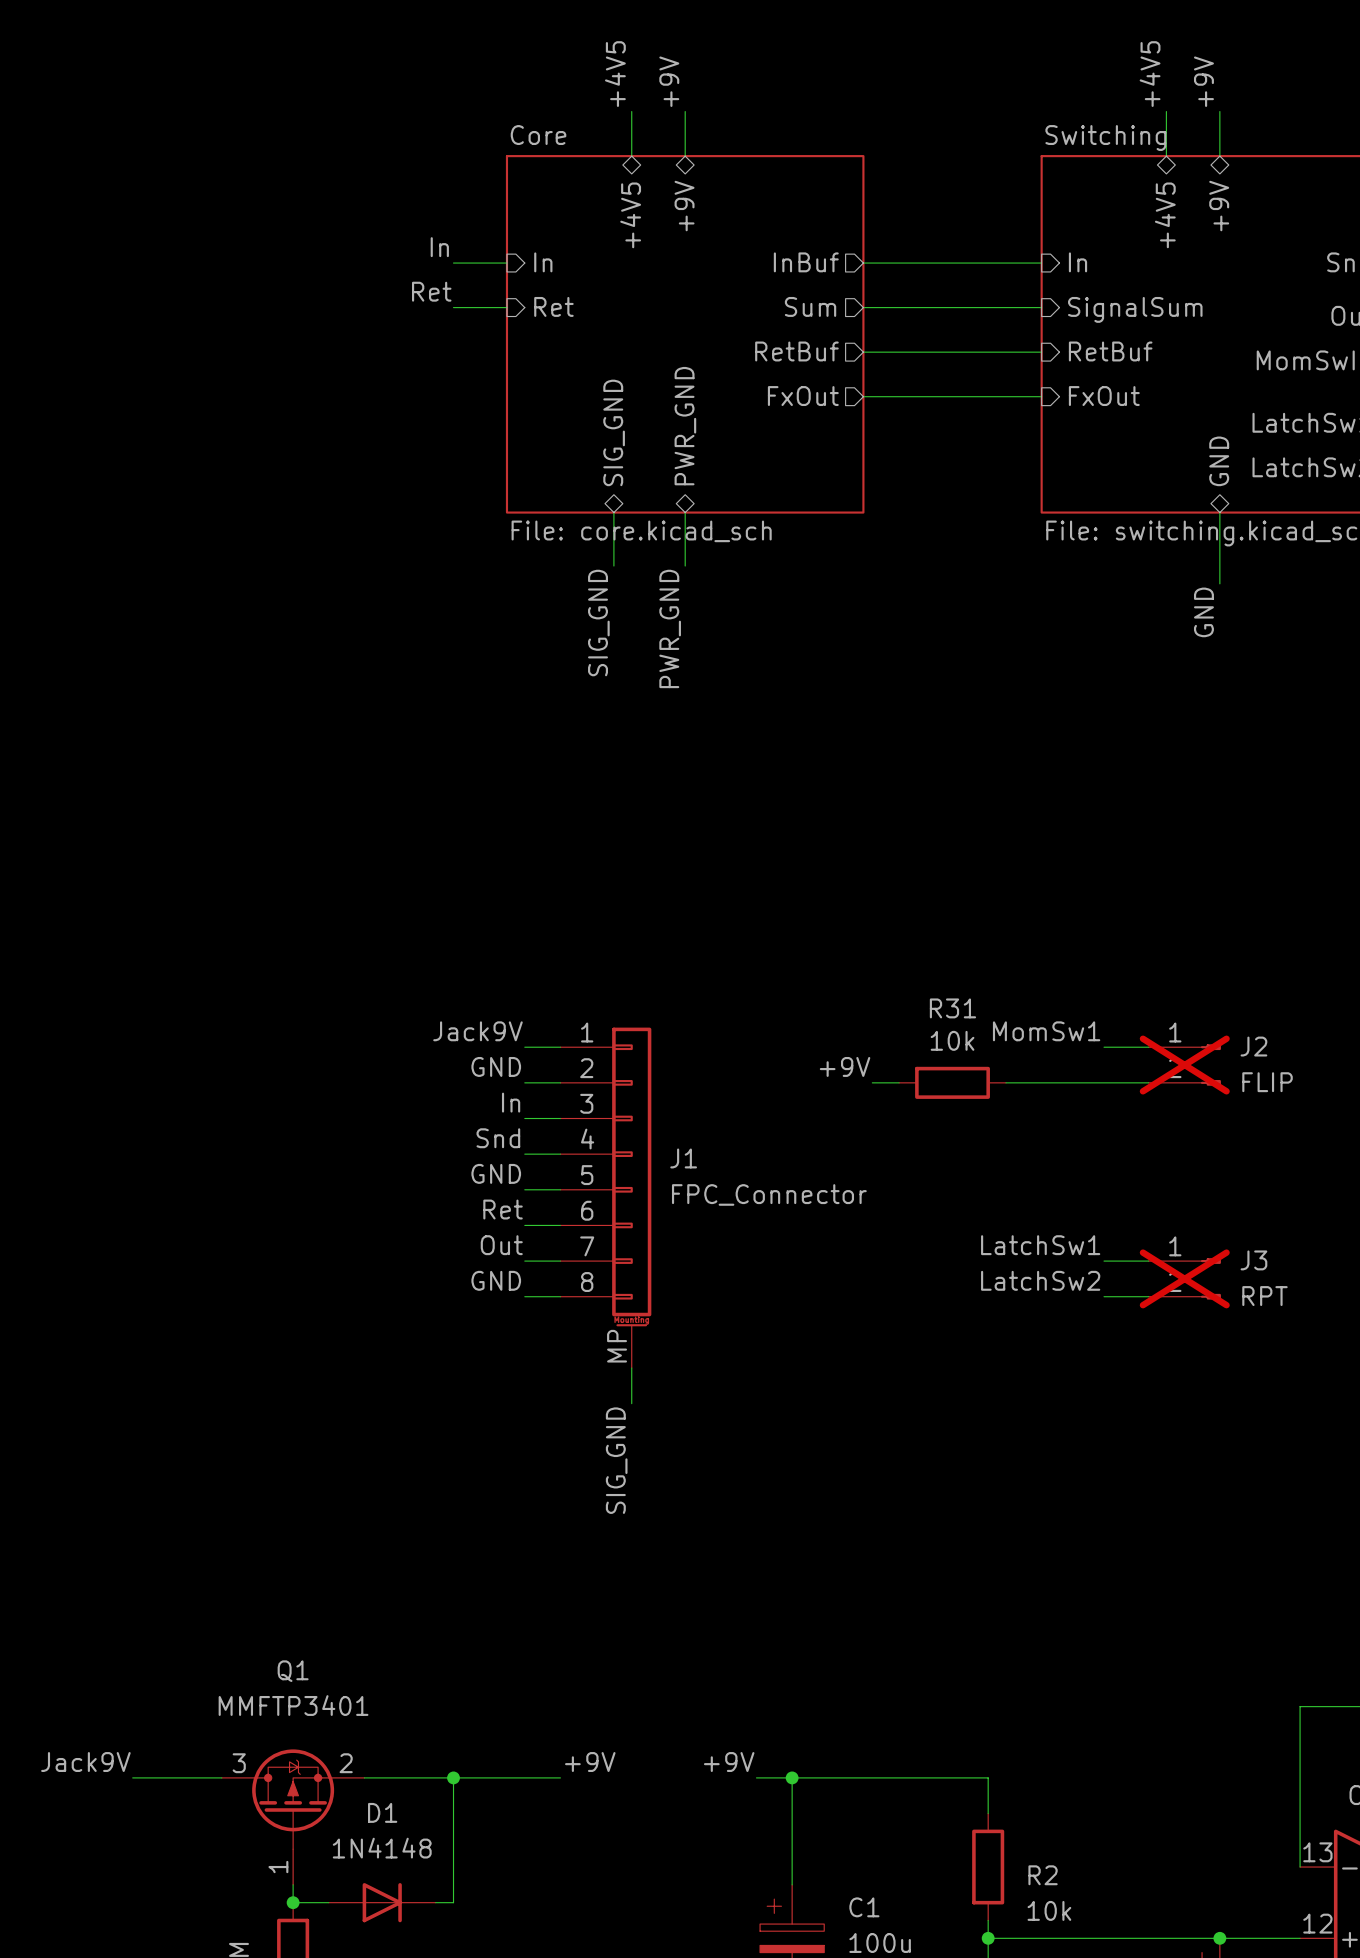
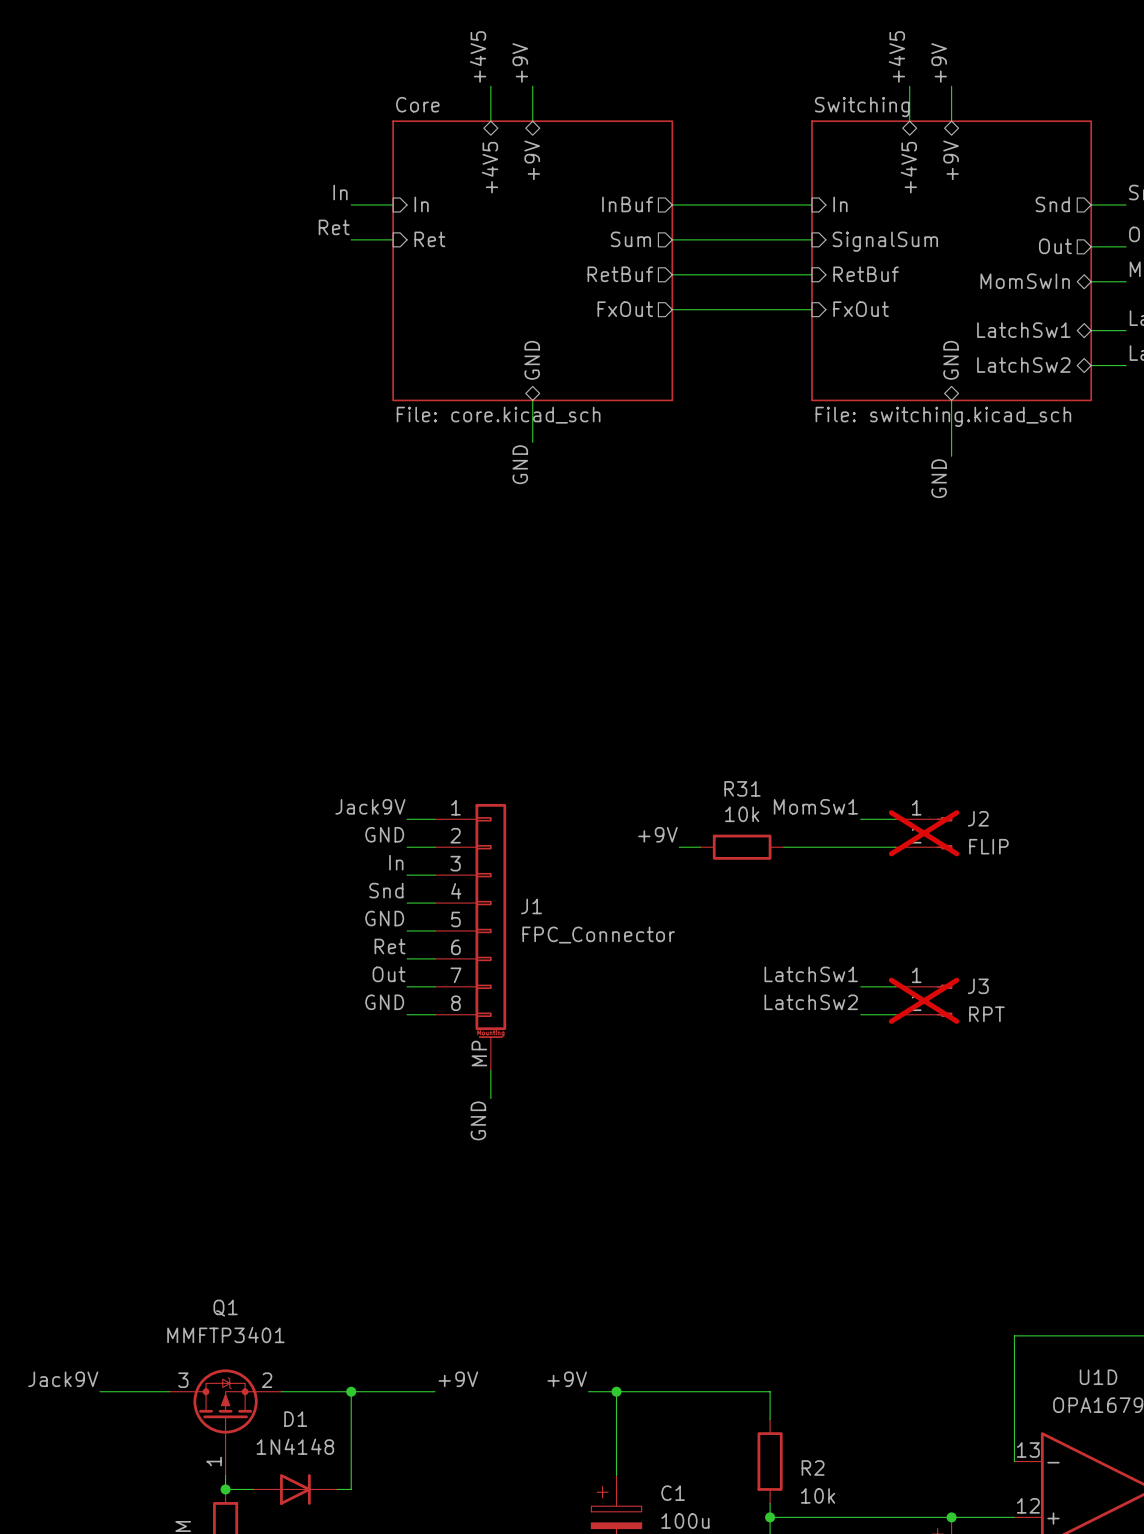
sheet pin: PWR_GND (685, 426) -> GND (532, 360)
sheet pin: SIG_GND (614, 432) -> none
wire: (613, 512) (613, 566) -> none
label: SIG_GND (598, 623) -> none
label: PWR_GND (670, 628) -> GND (520, 464)
label: SIG_GND (616, 1460) -> GND (478, 1120)

